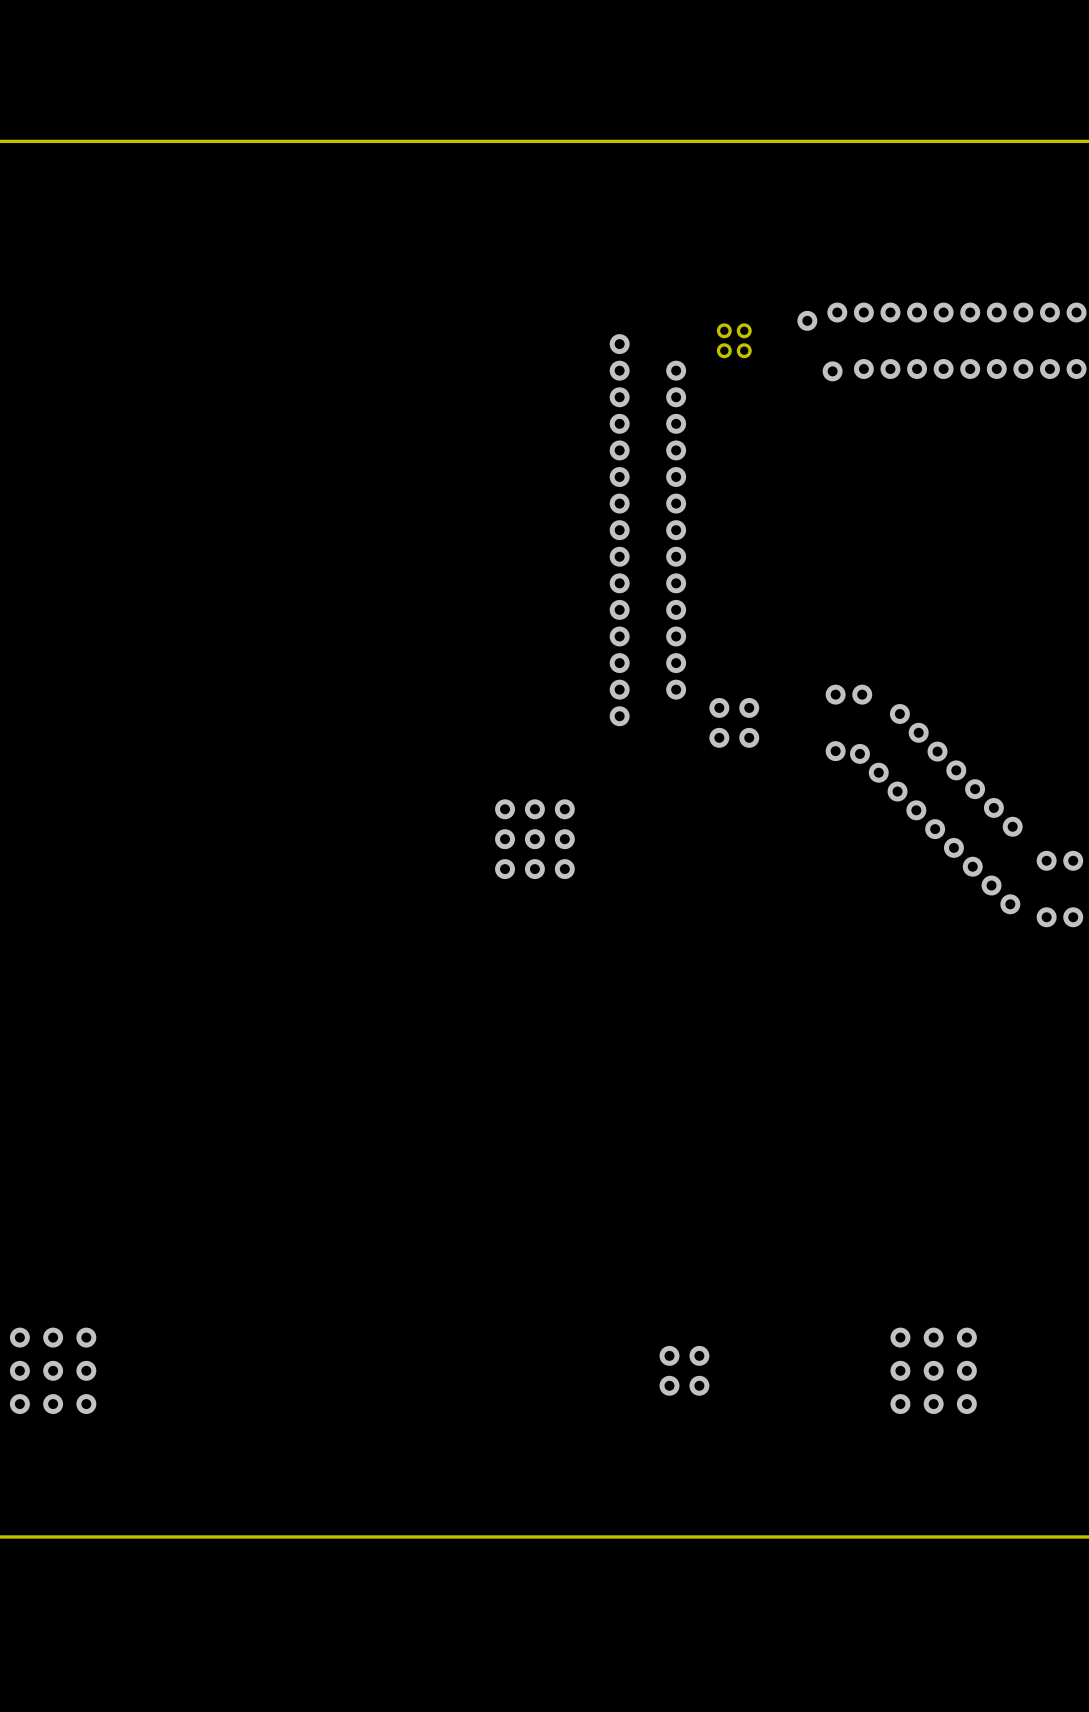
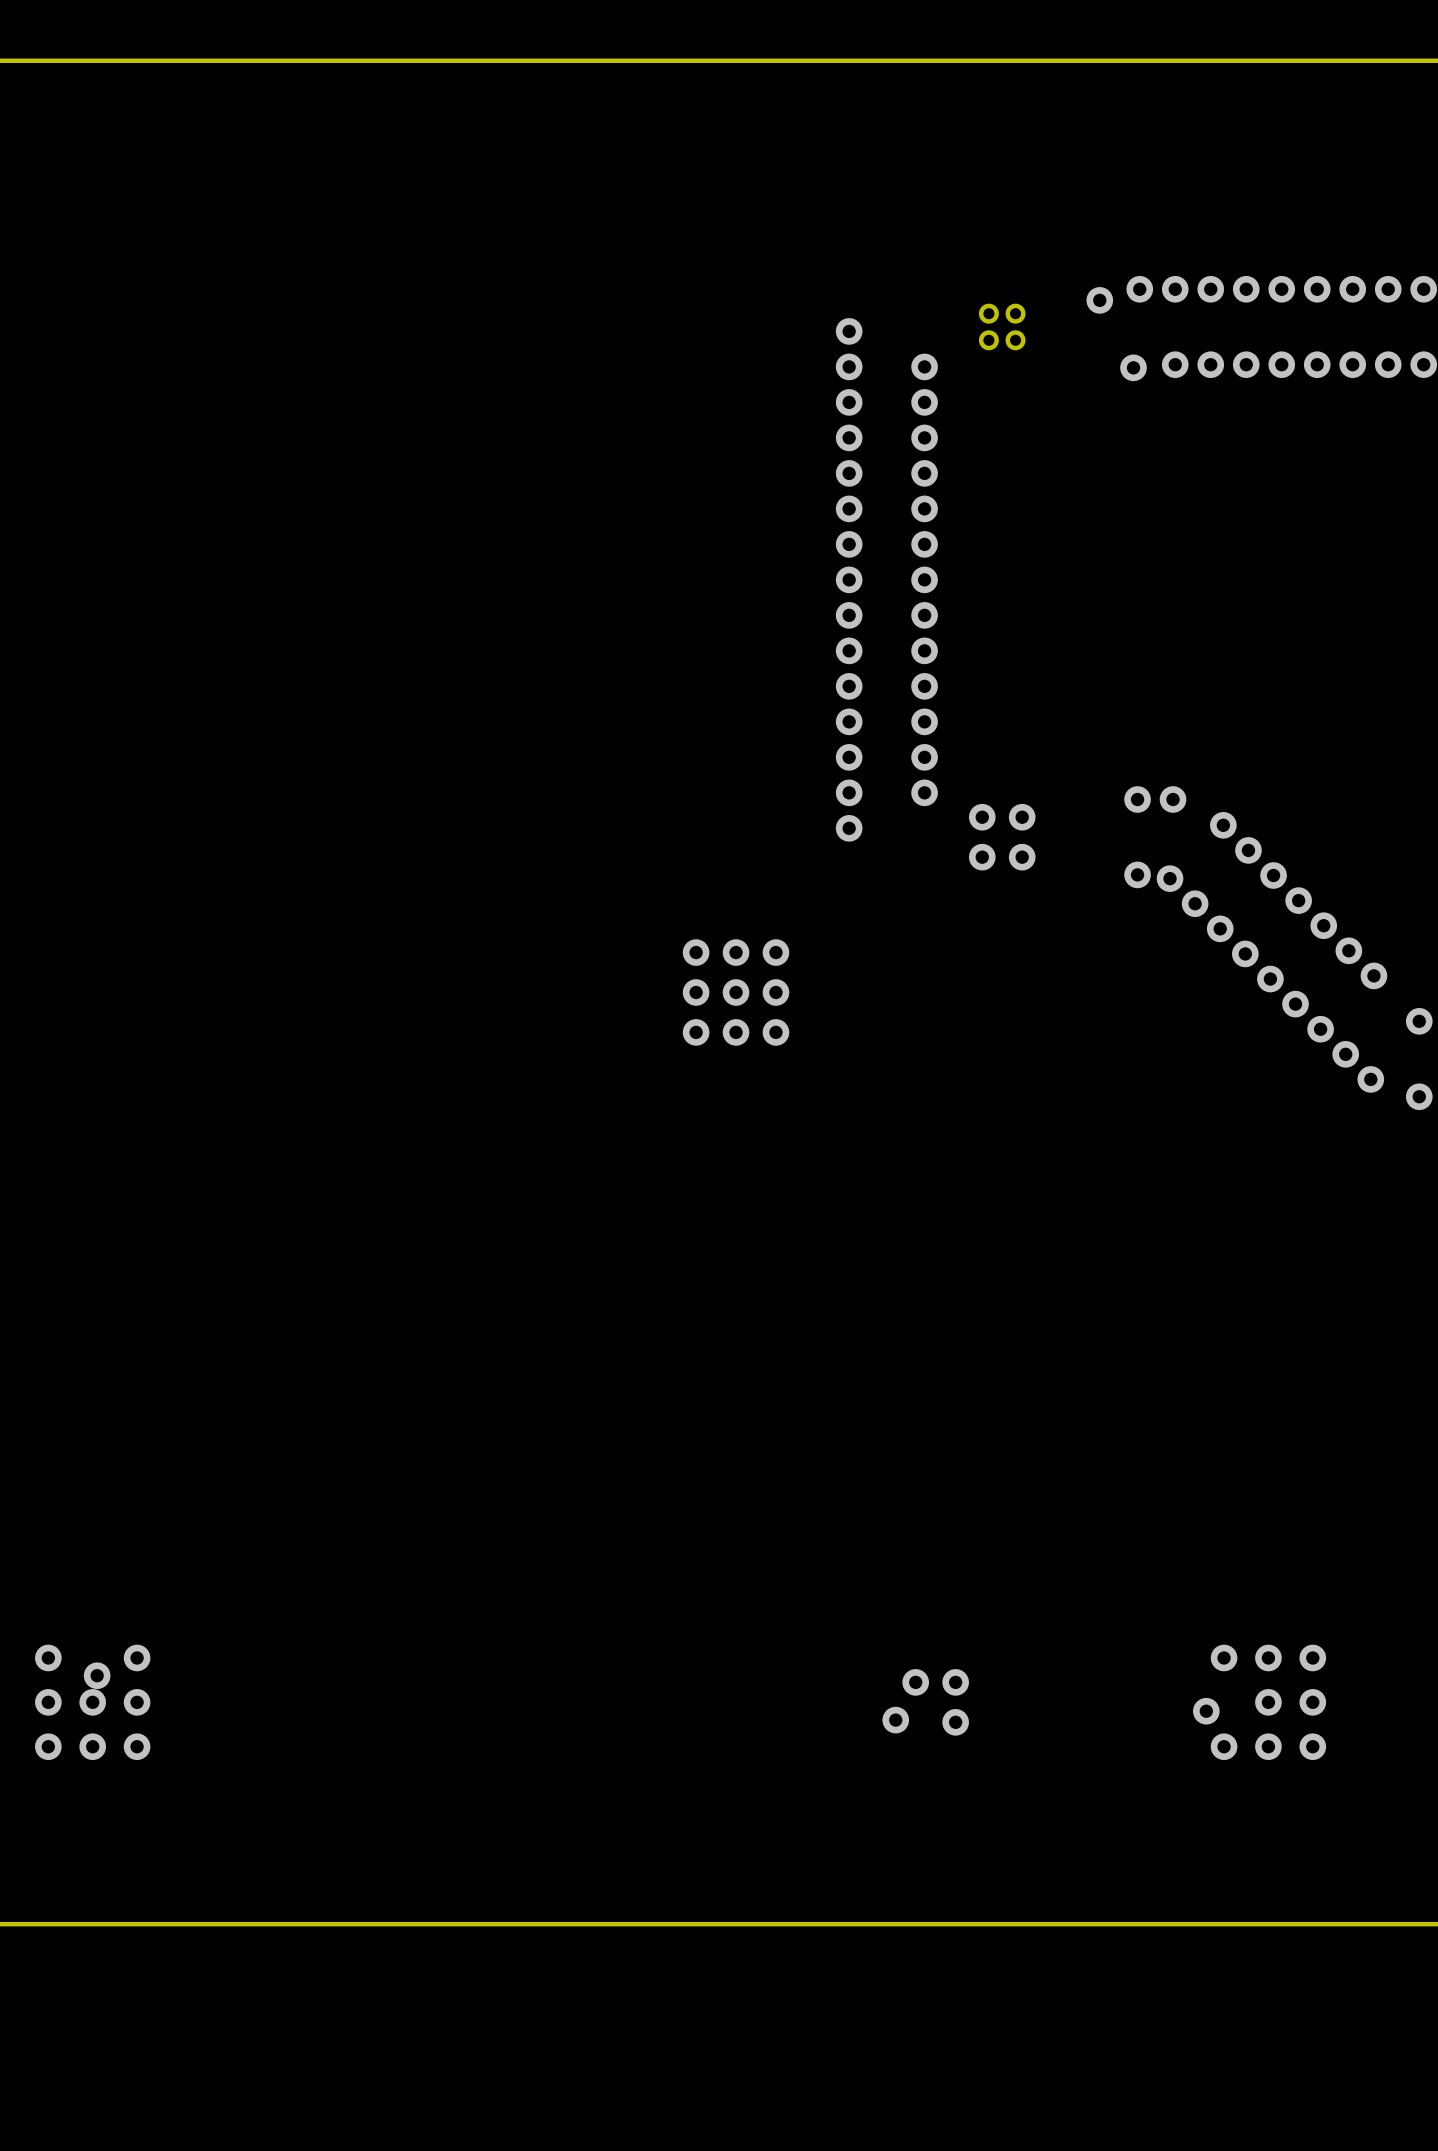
via position: (53, 1337) -> (97, 1675)
via position: (900, 1370) -> (1206, 1711)
via position: (669, 1385) -> (895, 1720)

